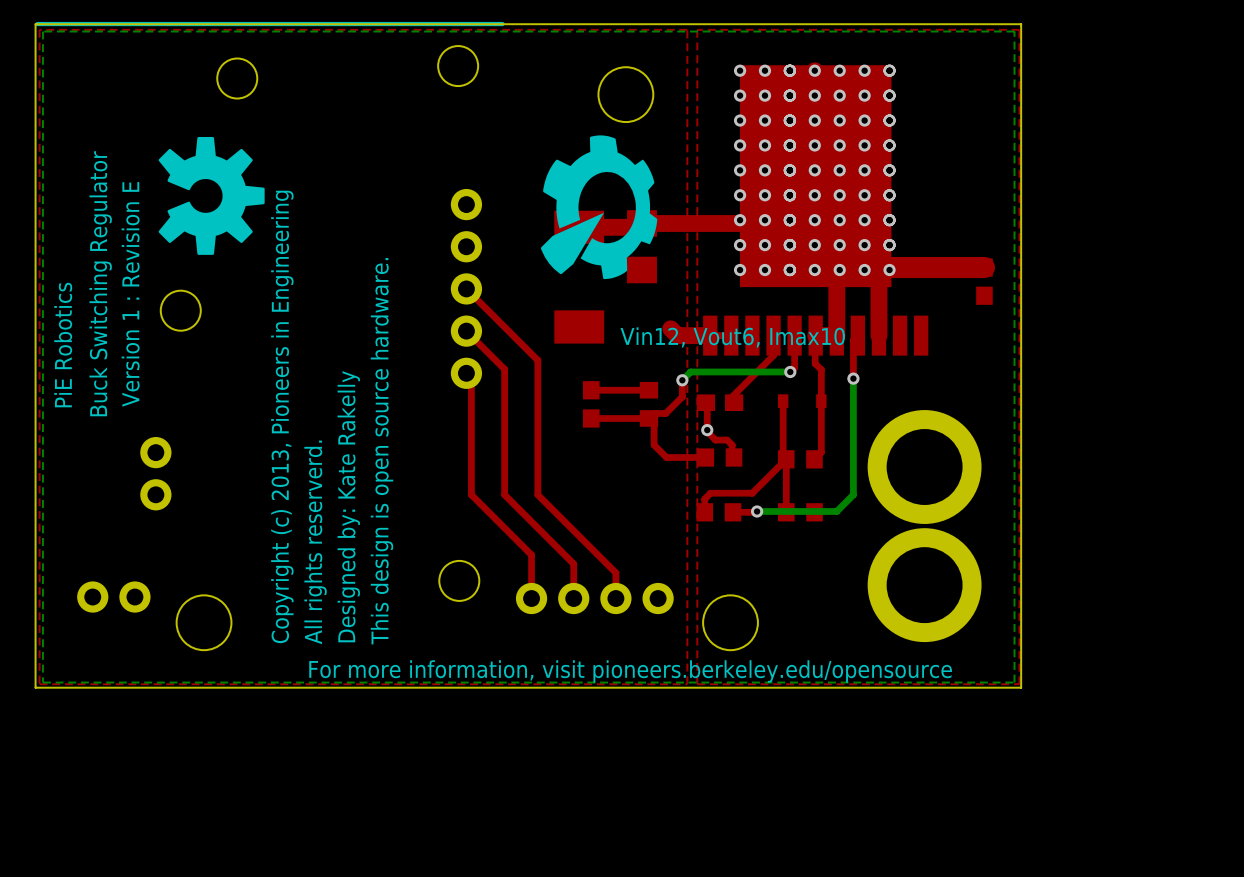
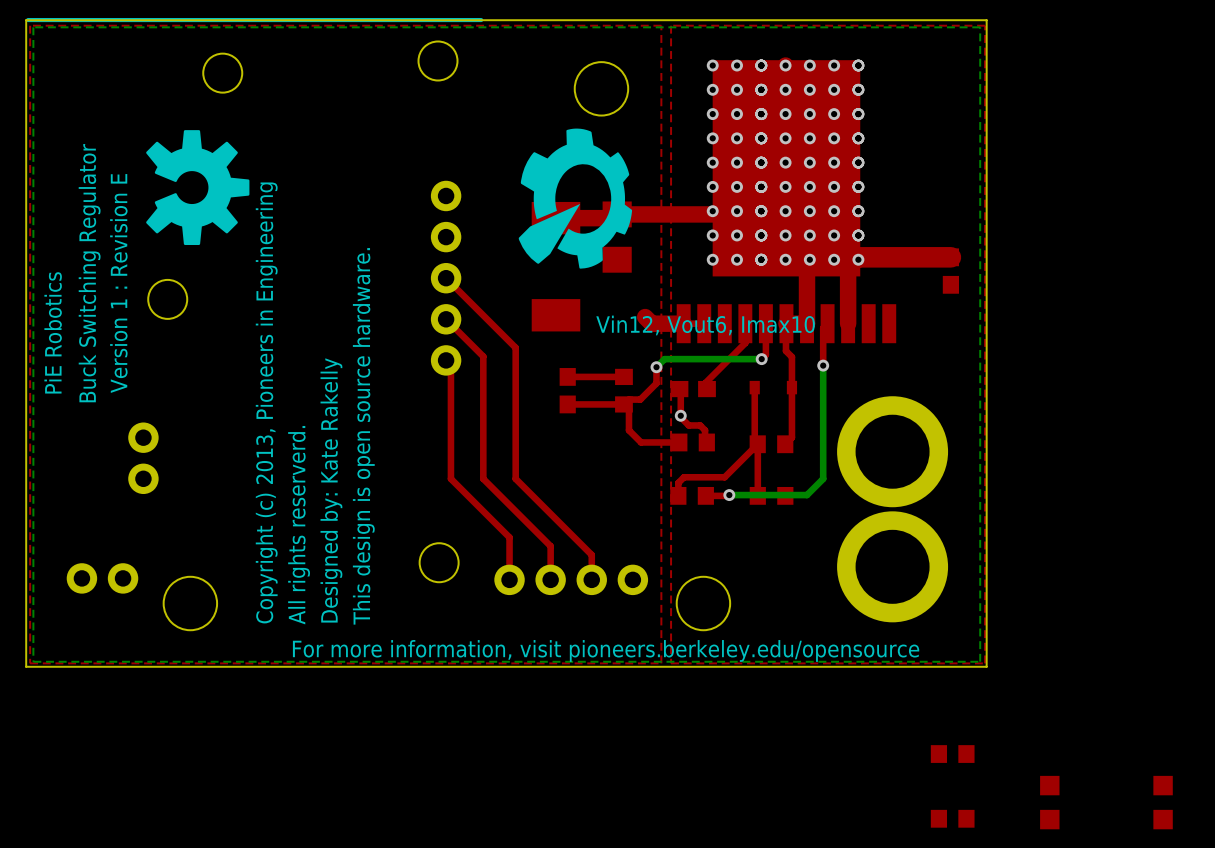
part: none -> (952, 754)
part: none -> (1049, 802)
part: none -> (1163, 802)
part: none -> (952, 818)

